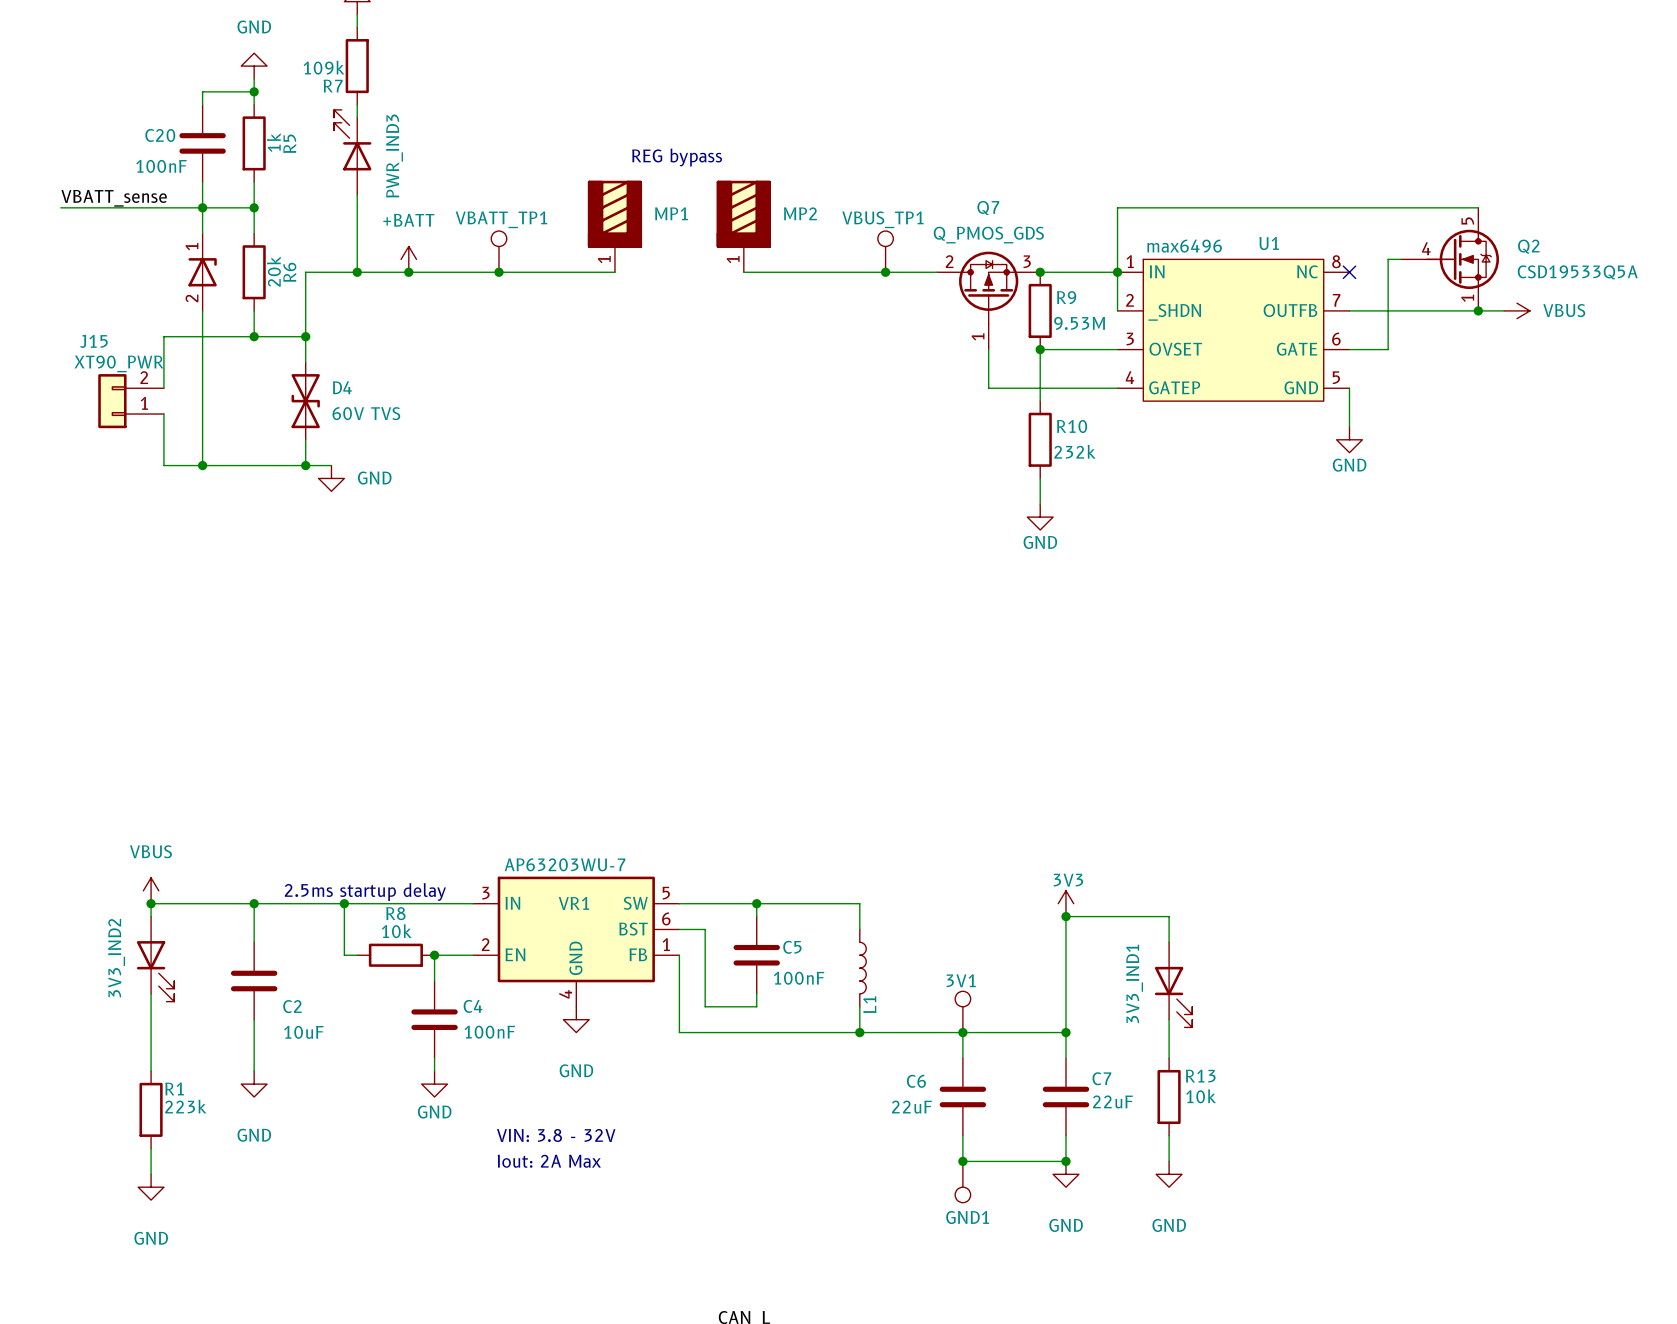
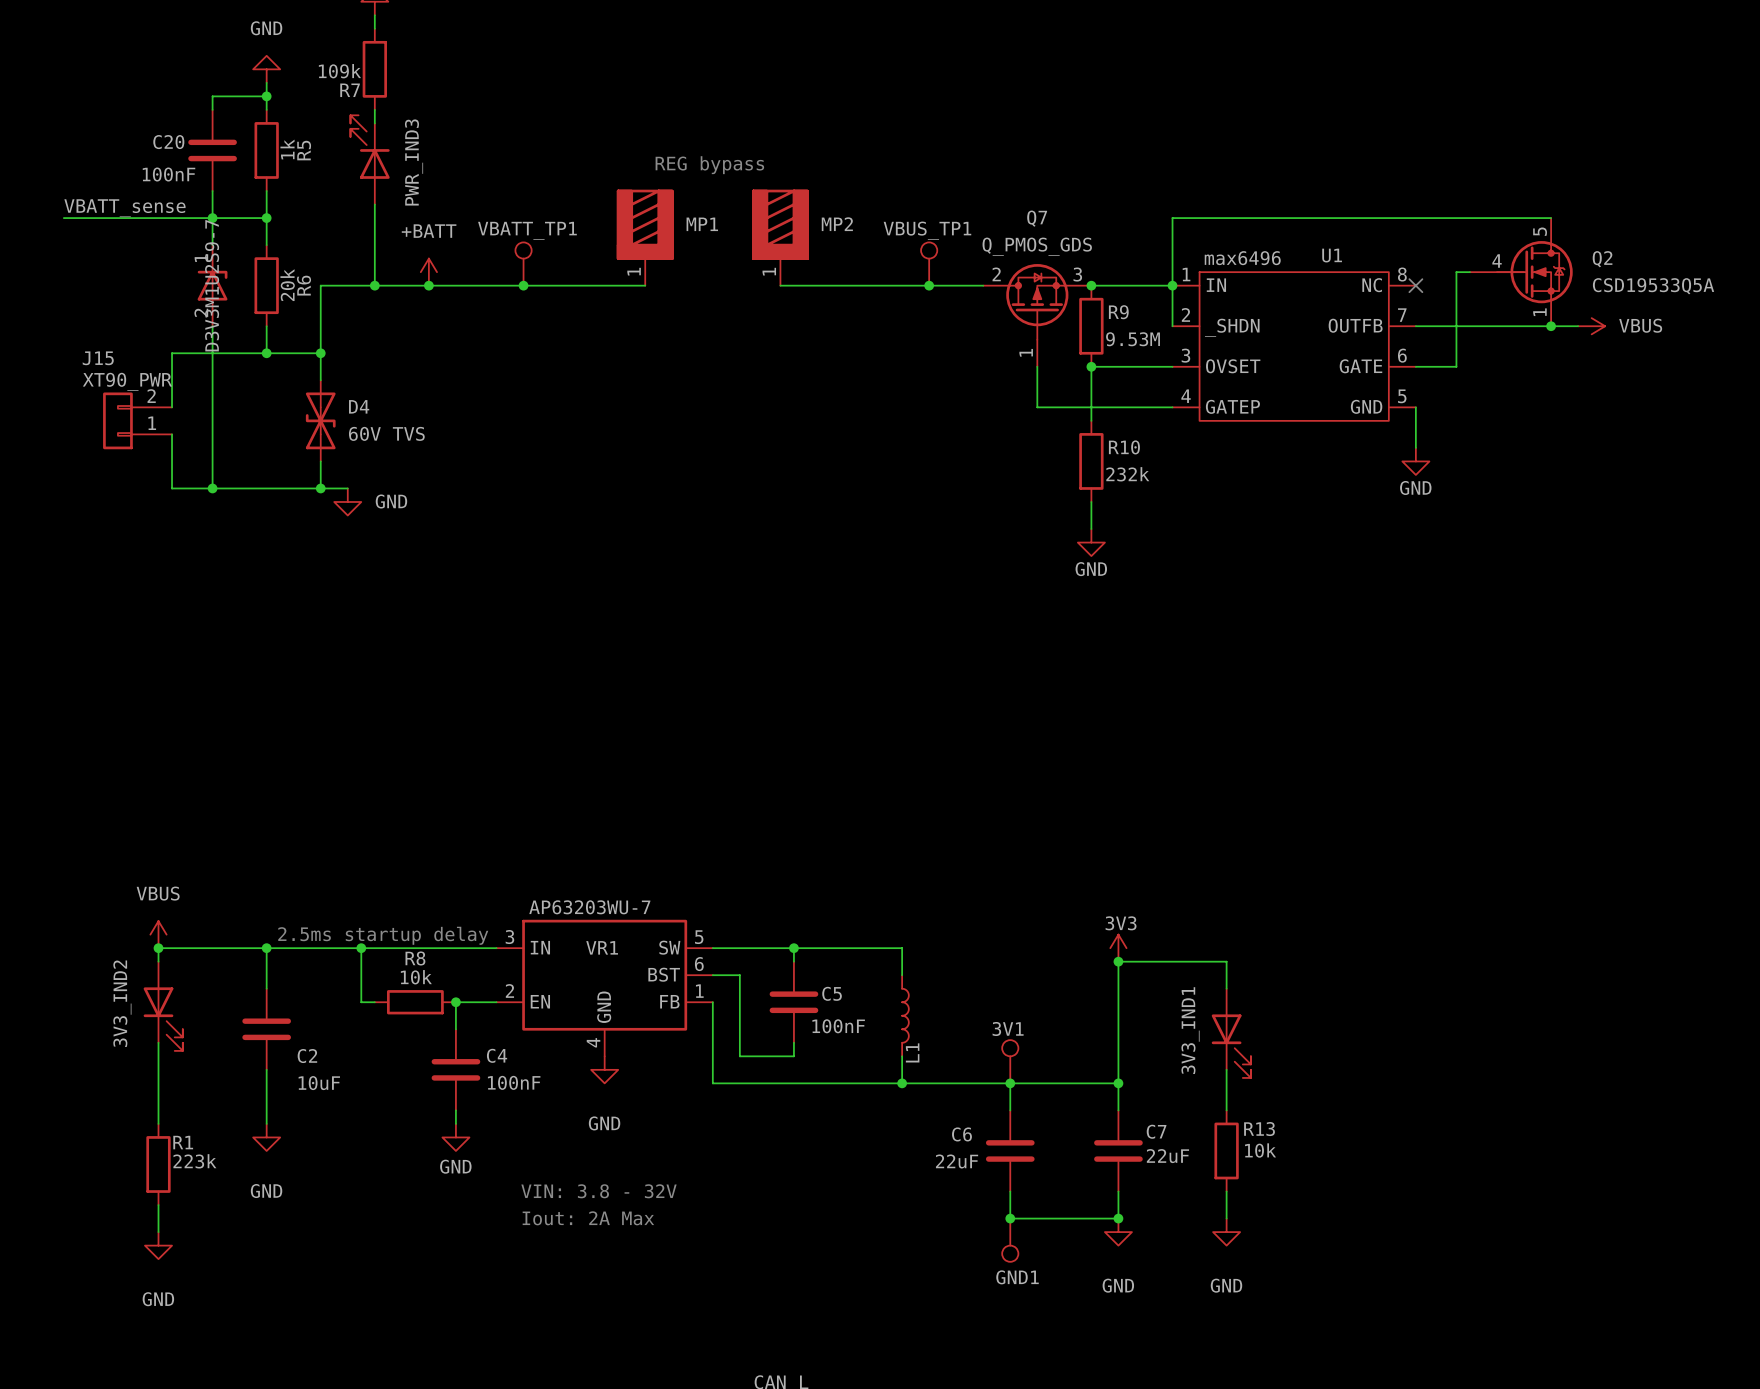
part value: none -> D3V3M1U2S9-7 (212, 285)

